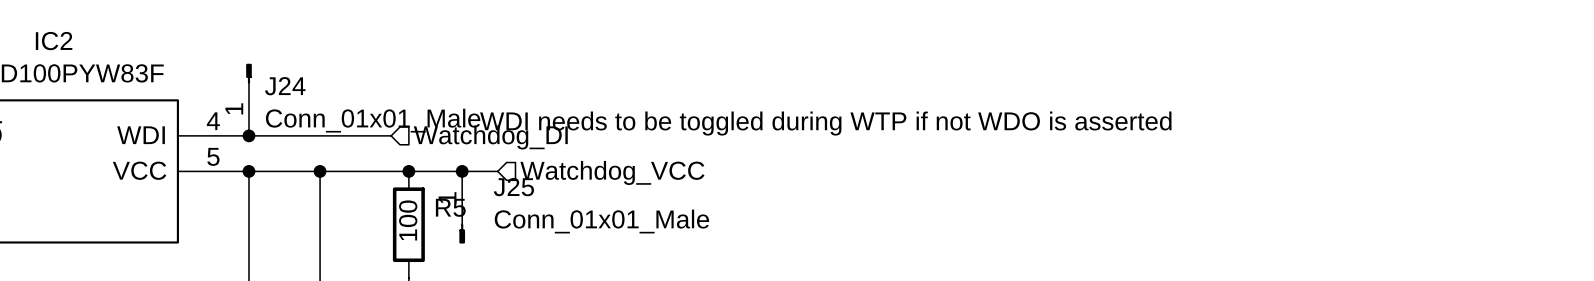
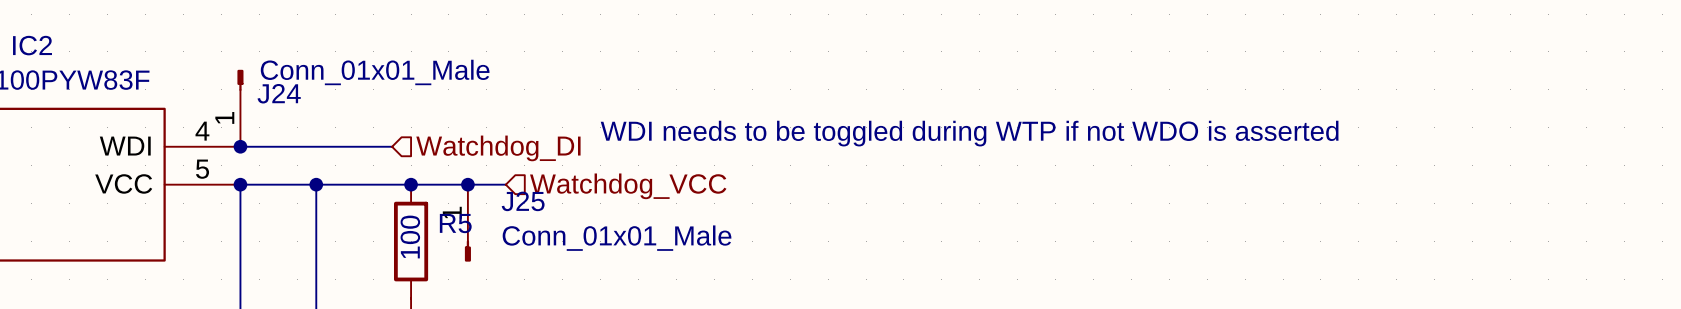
J24 value position: Conn_01x01_Male (373, 120) -> Conn_01x01_Male (375, 72)
text position: WDI needs to be toggled during WTP if not WDO is asserted (825, 123) -> WDI needs to be toggled during WTP if not WDO is asserted (969, 133)

